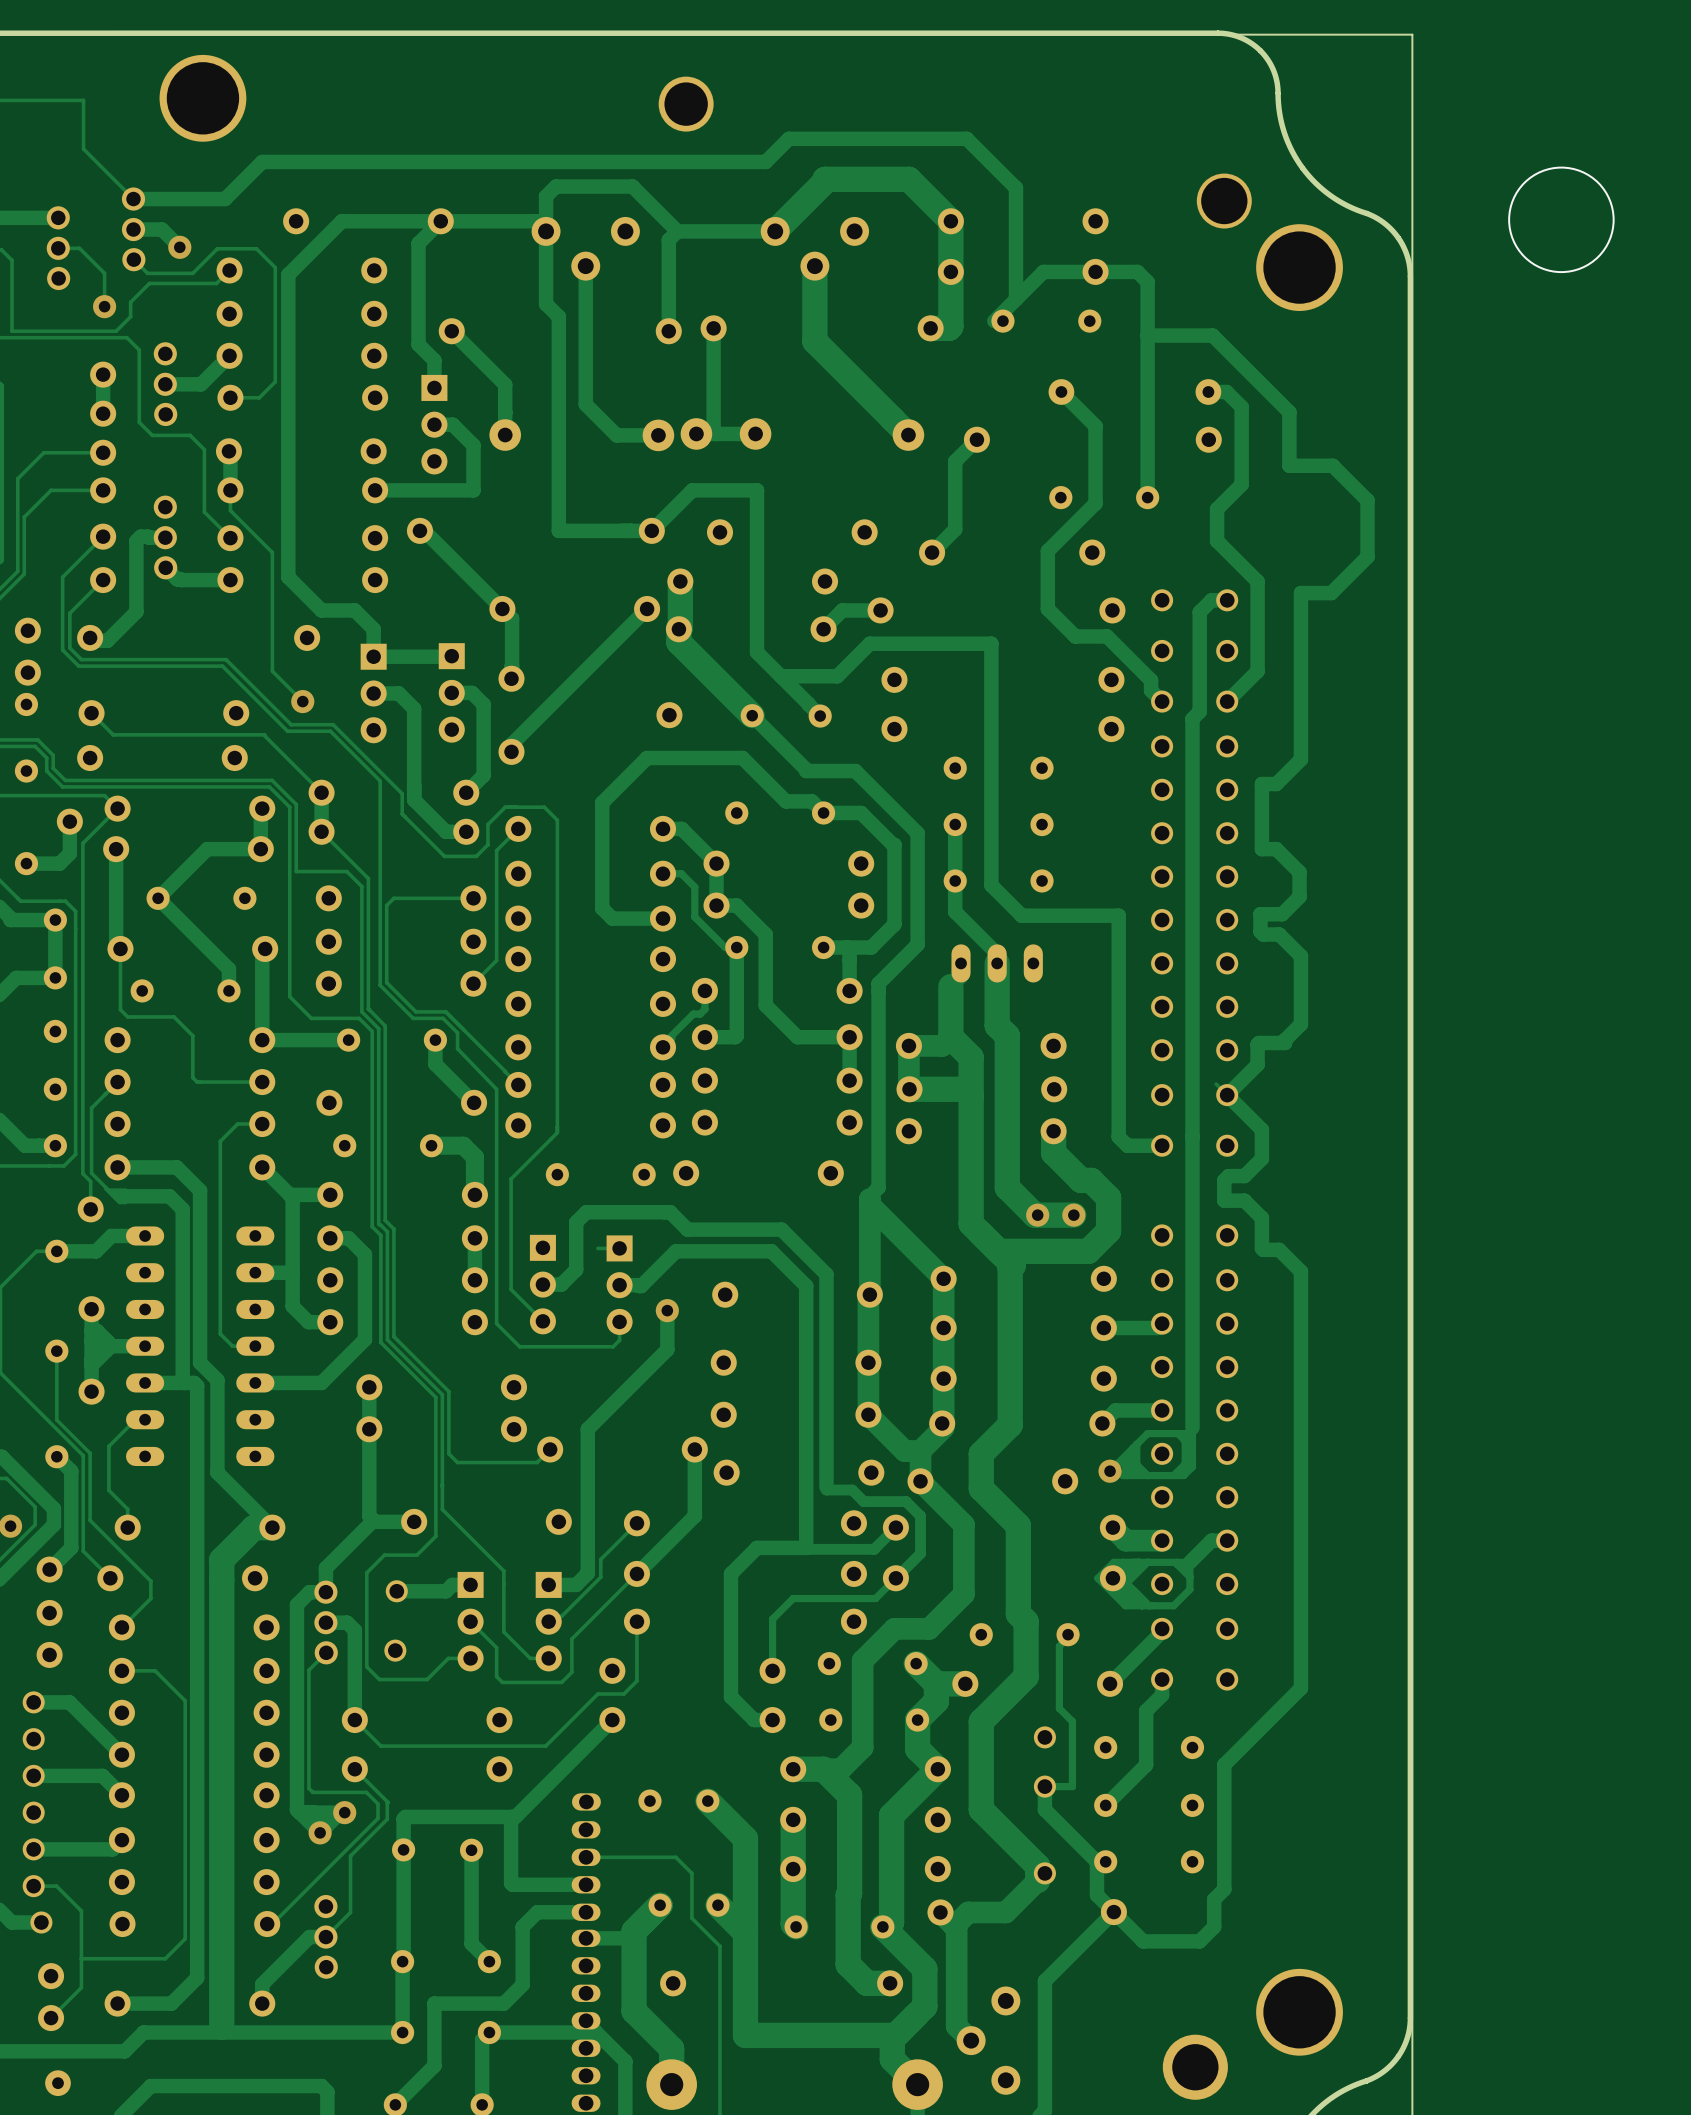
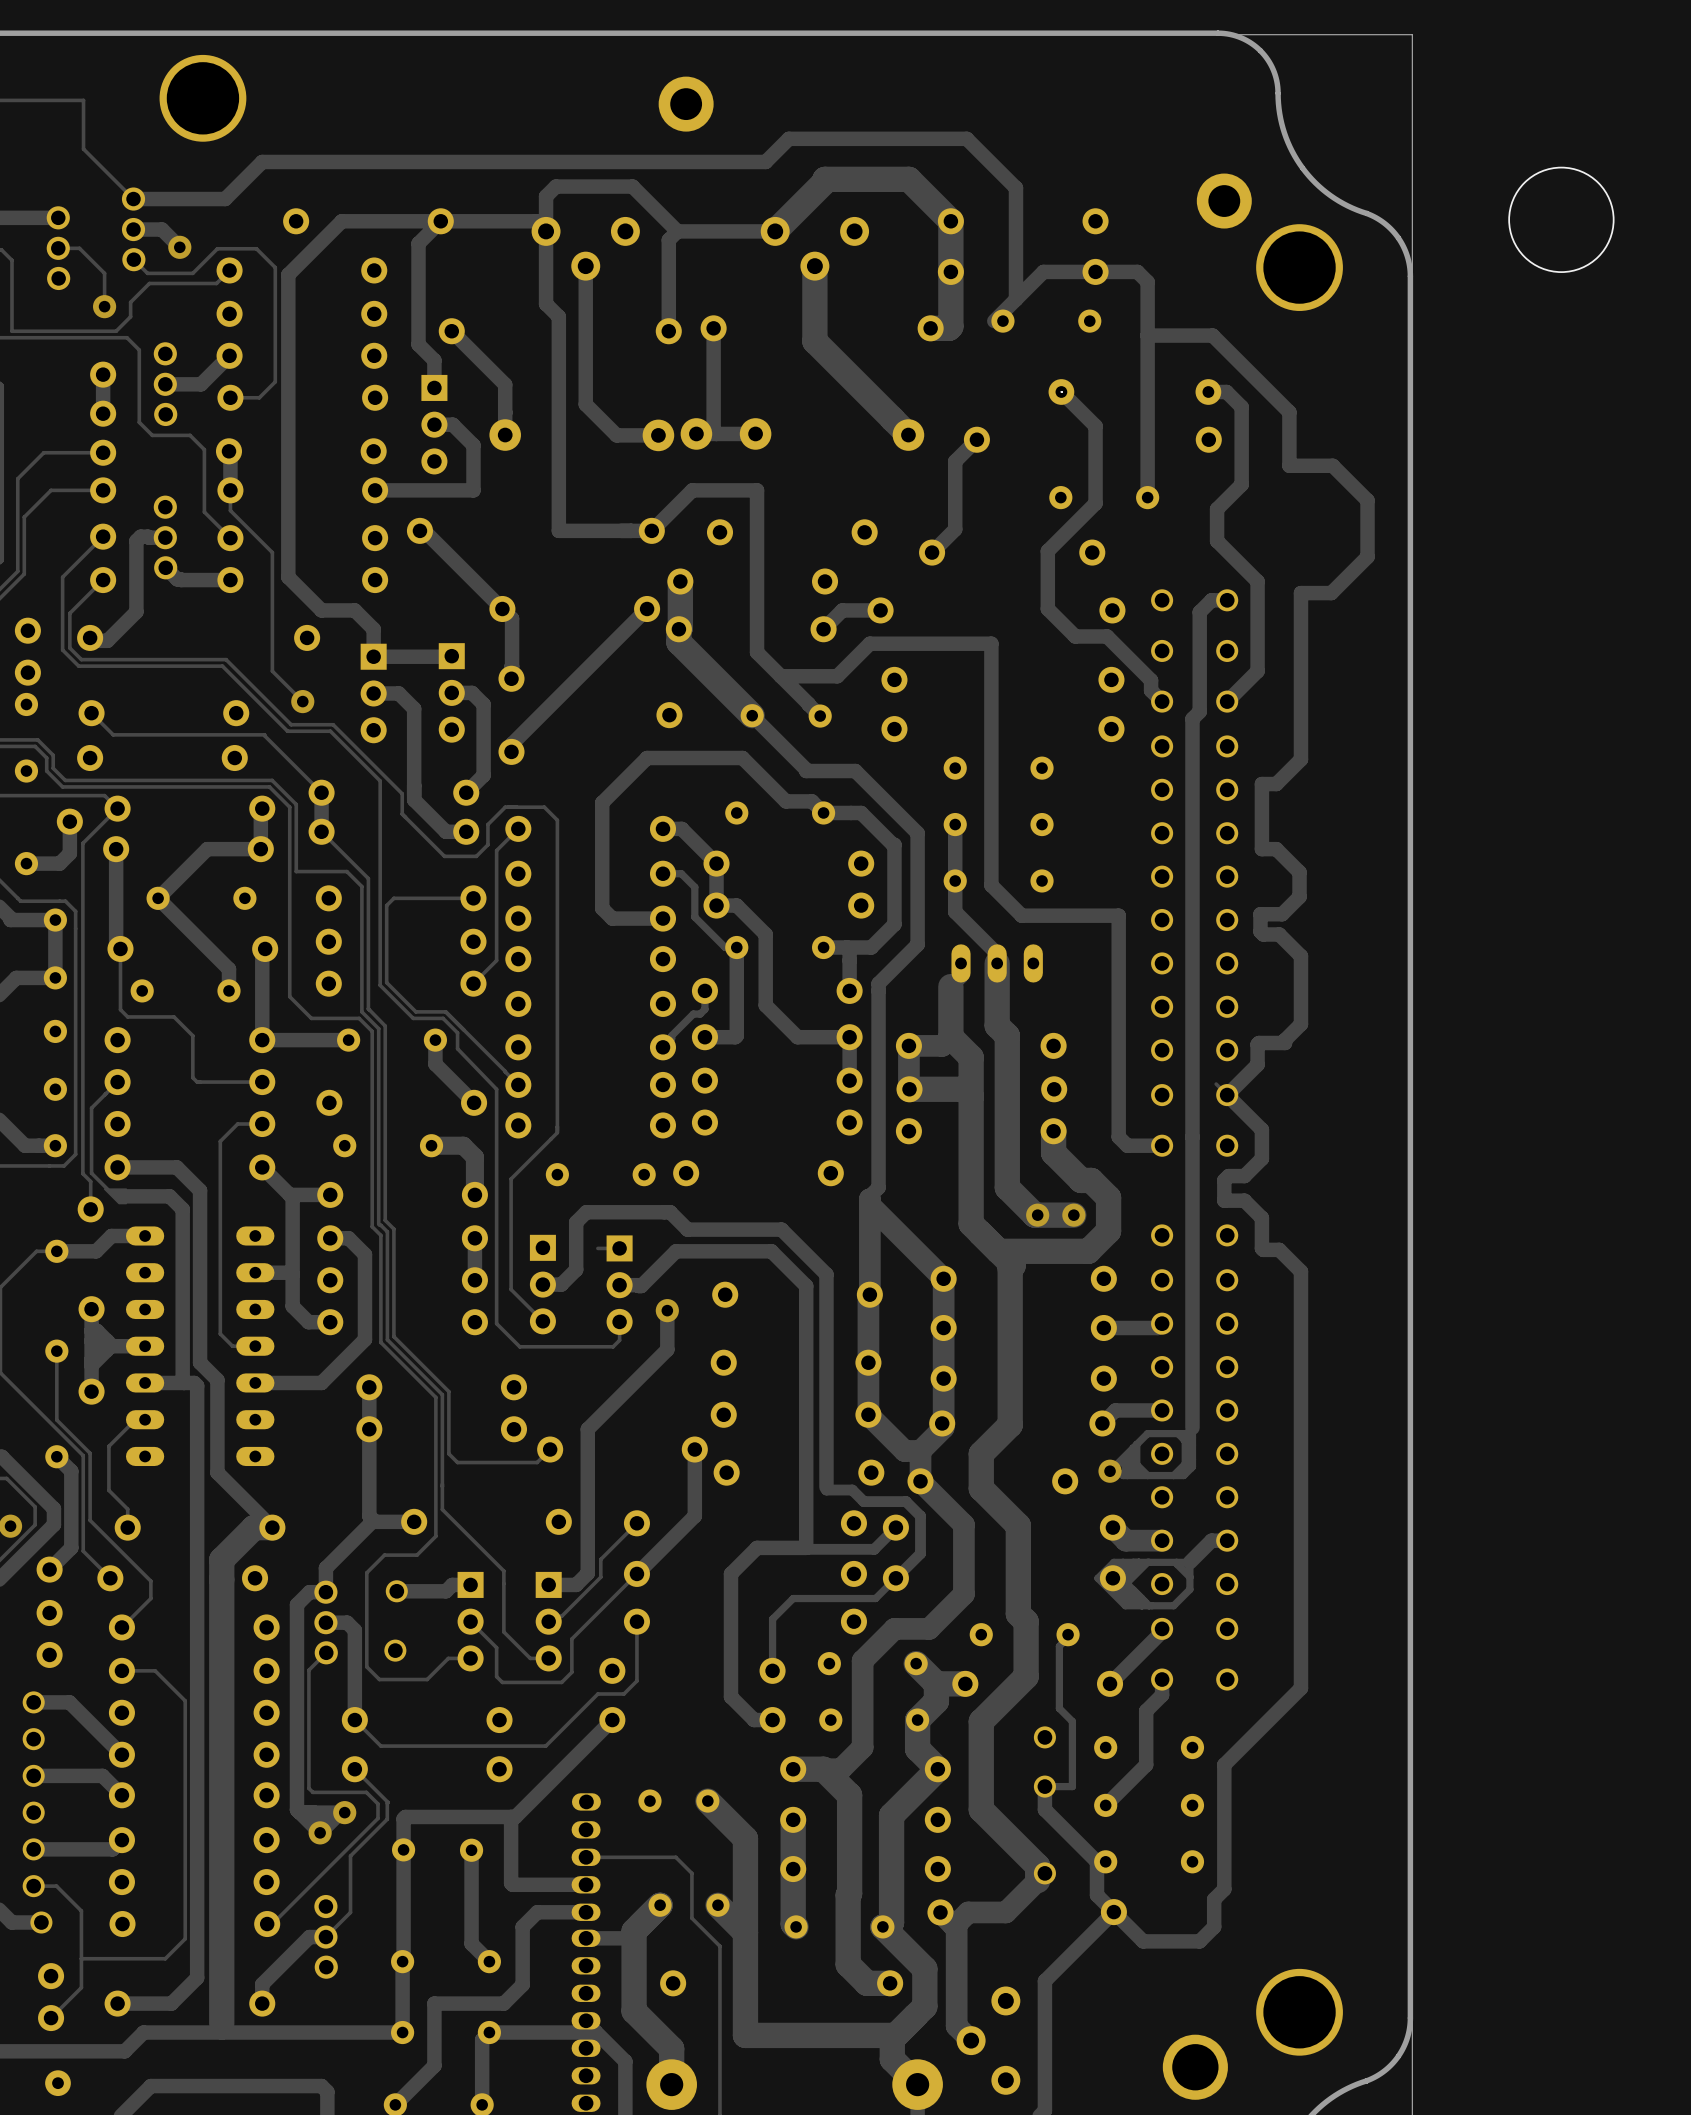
part footprint: [658, 76, 714, 132] -> [658, 76, 714, 132]
part footprint: [1196, 173, 1252, 229] -> [1196, 173, 1252, 229]

